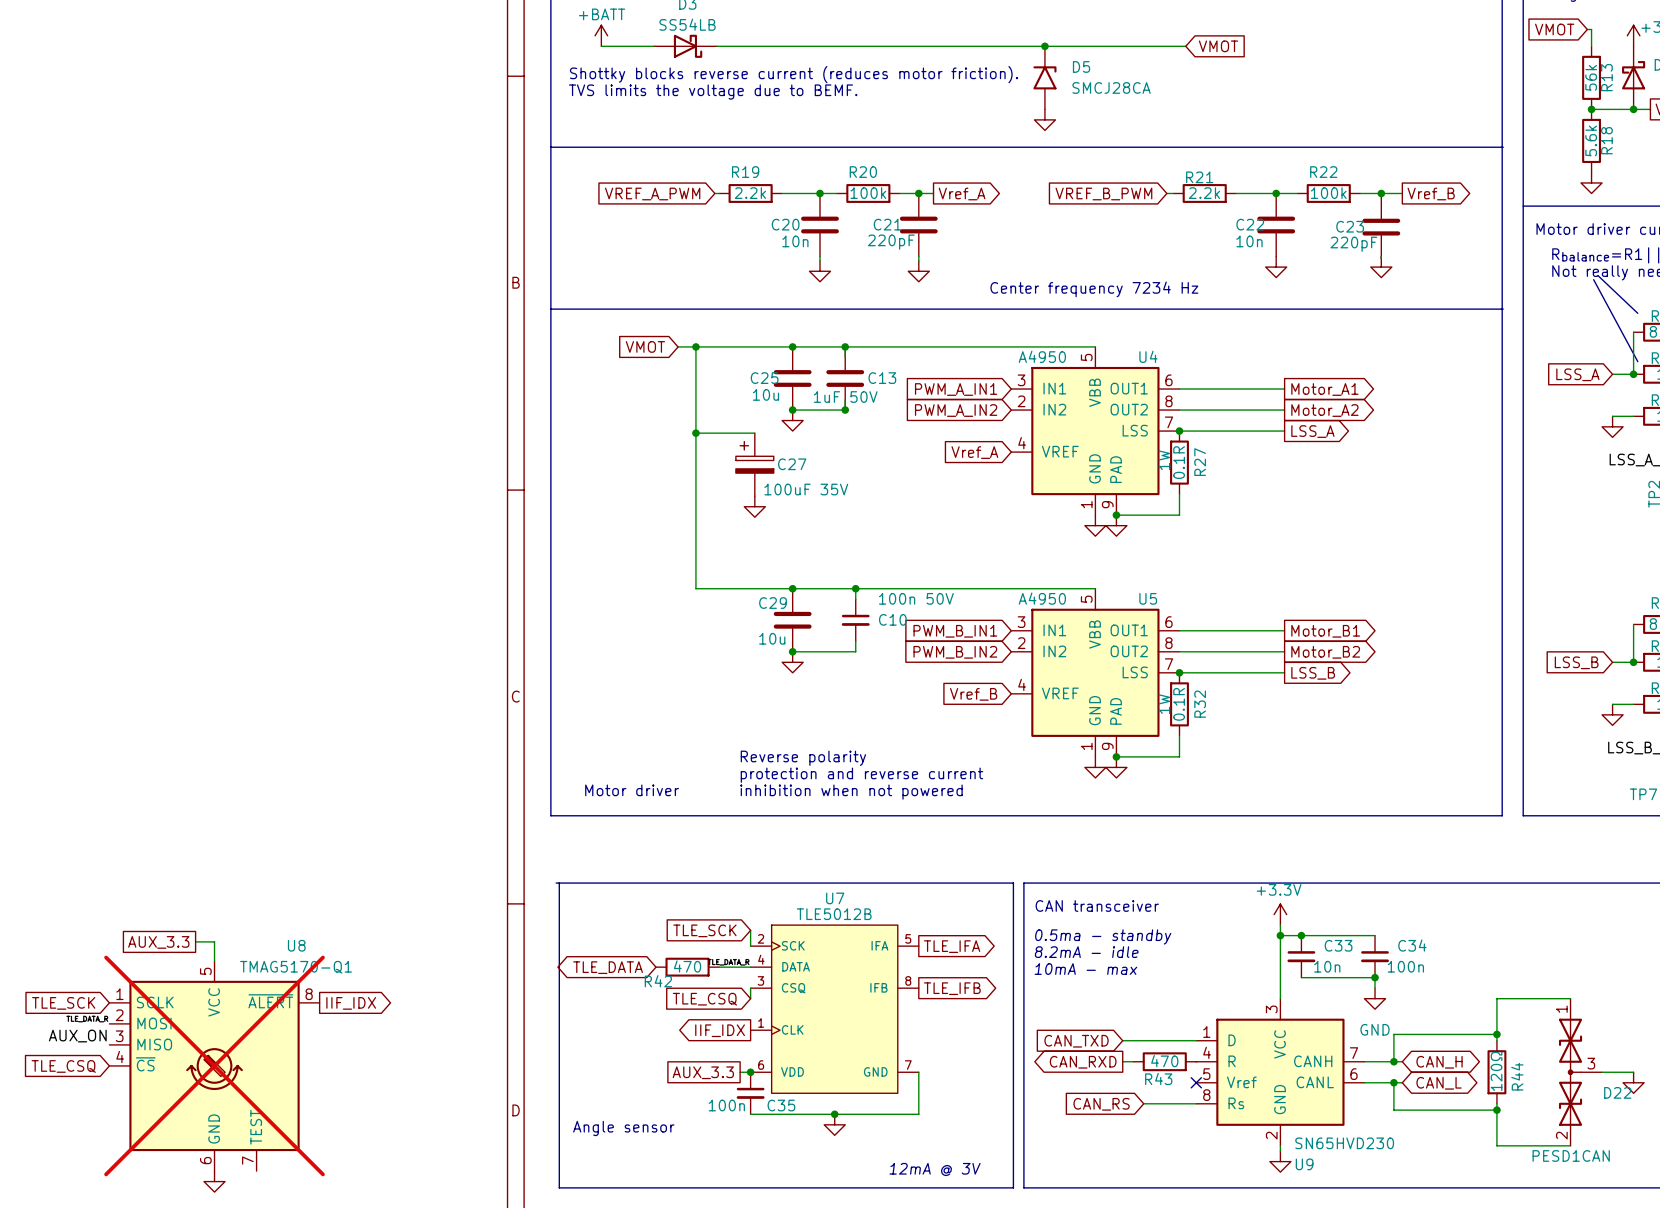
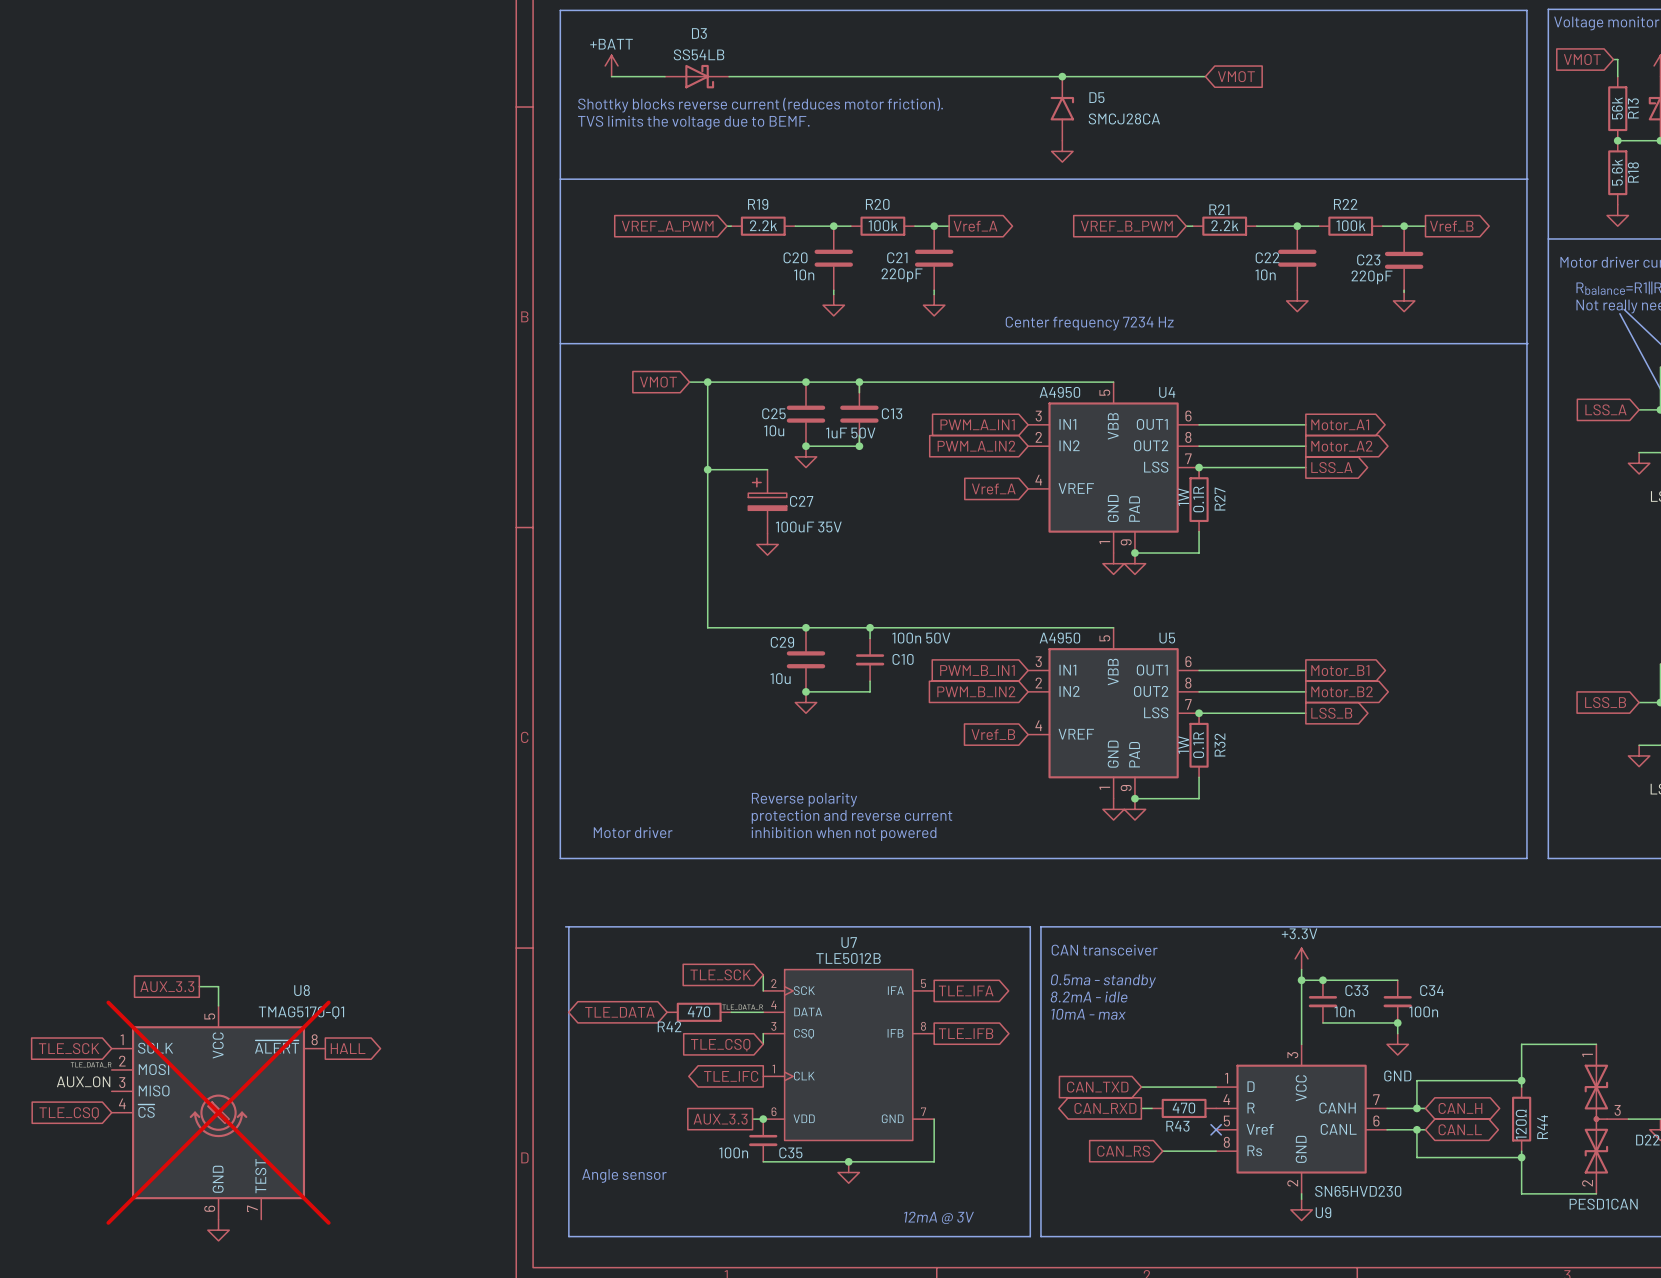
global label: IIF_IDX (351, 1003) -> HALL (348, 1048)
global label: IIF_IDX (720, 1030) -> TLE_IFC (731, 1076)

